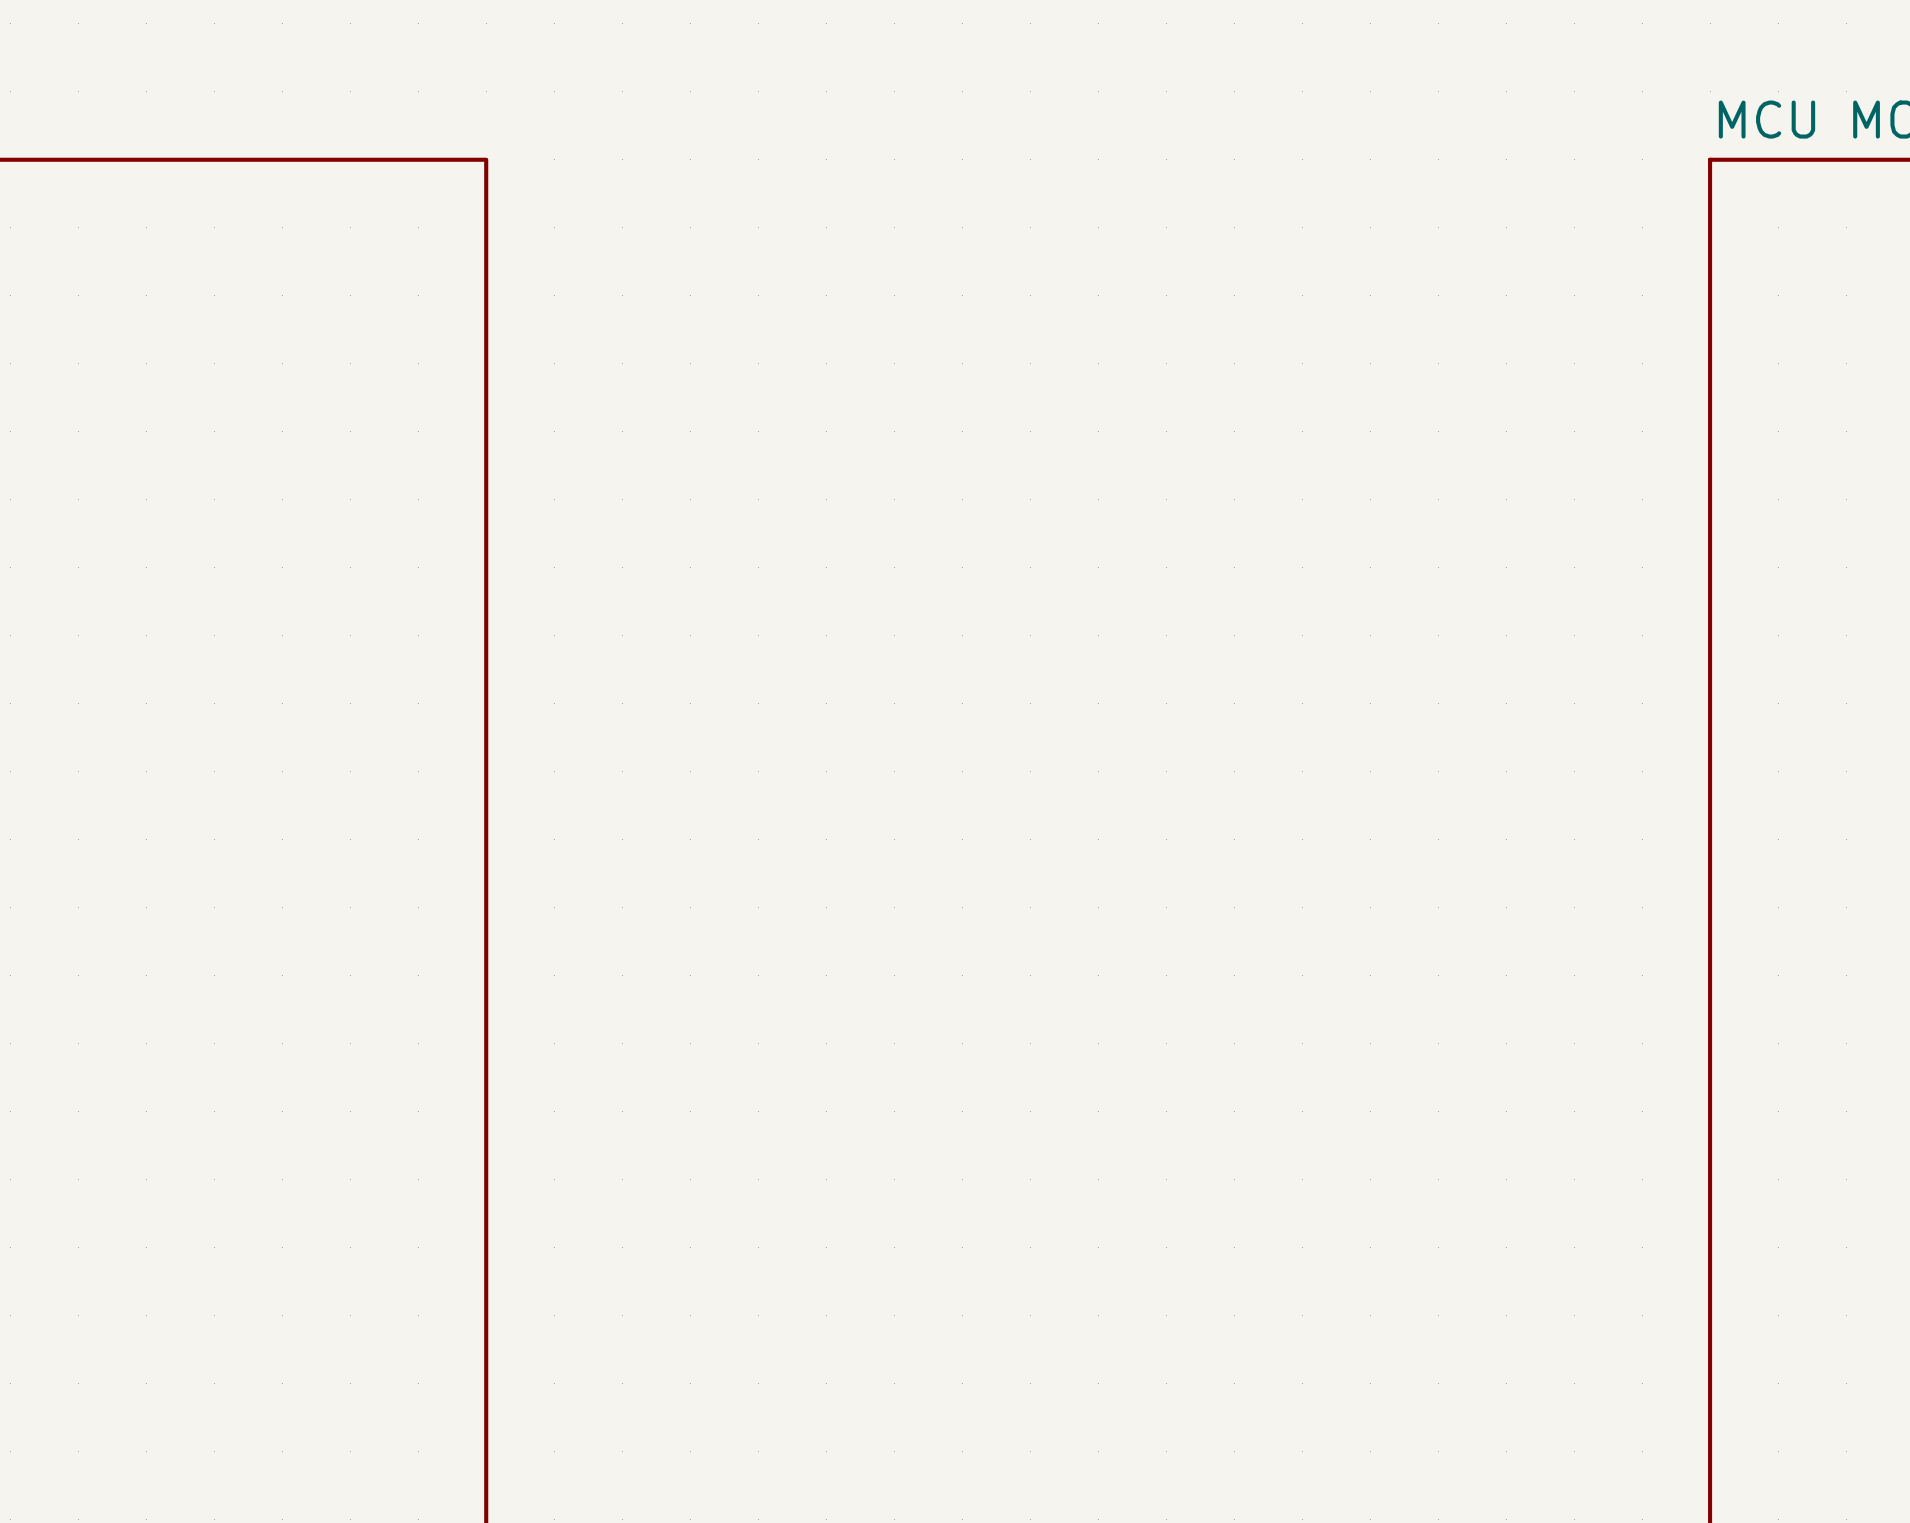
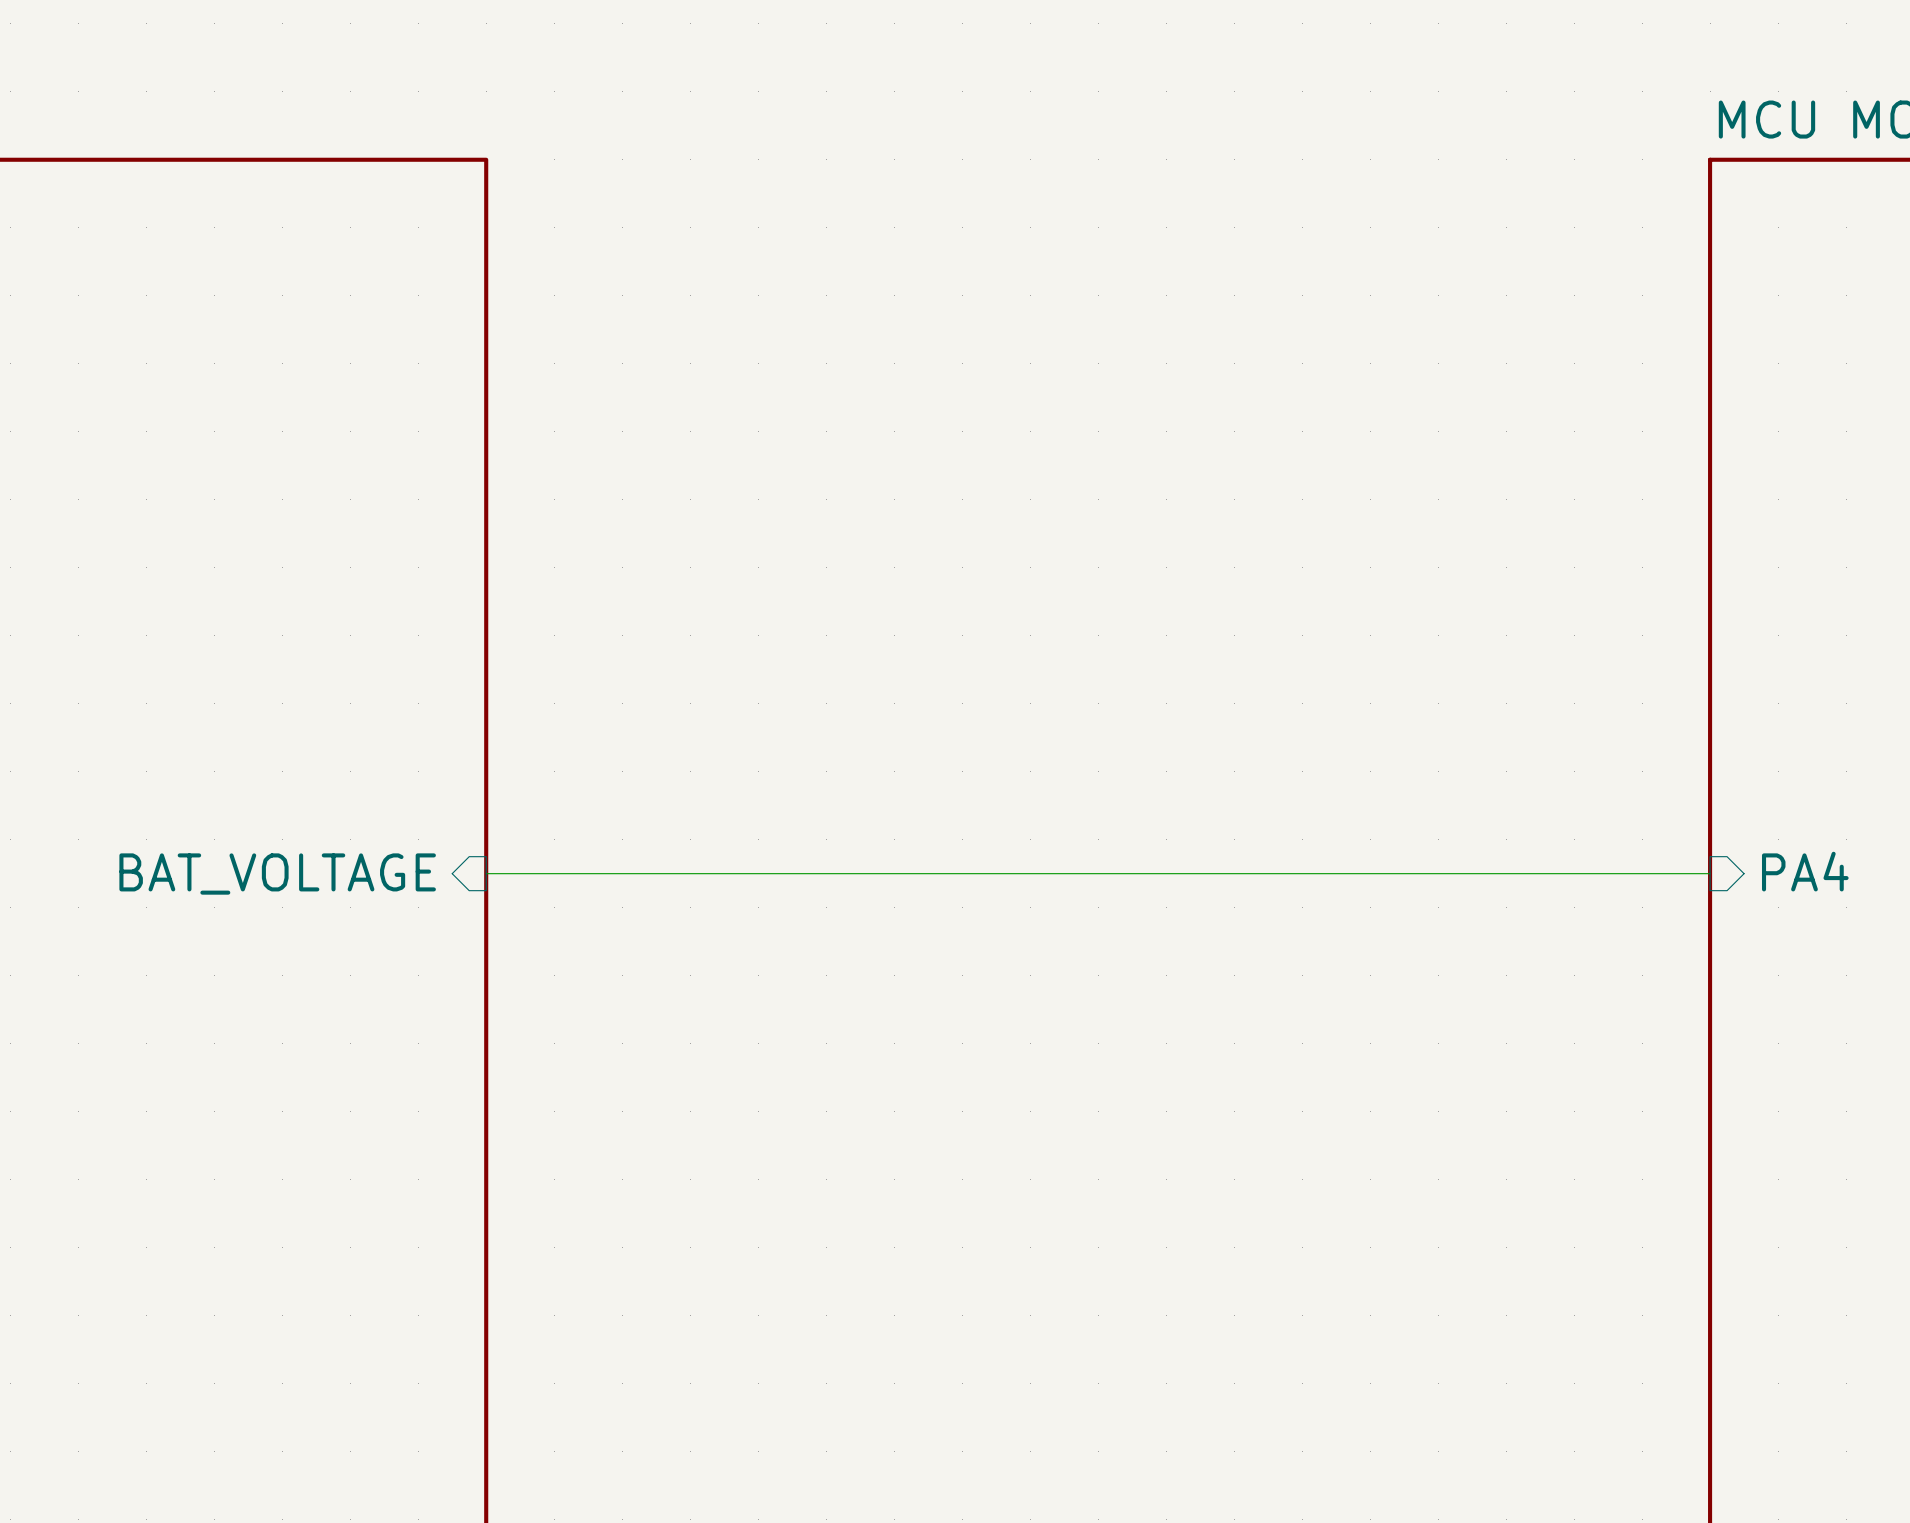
sheet pin: none -> PA4 (1805, 871)
wire: none -> (486, 873) (1710, 873)
sheet pin: none -> BAT_VOLTAGE (277, 874)

